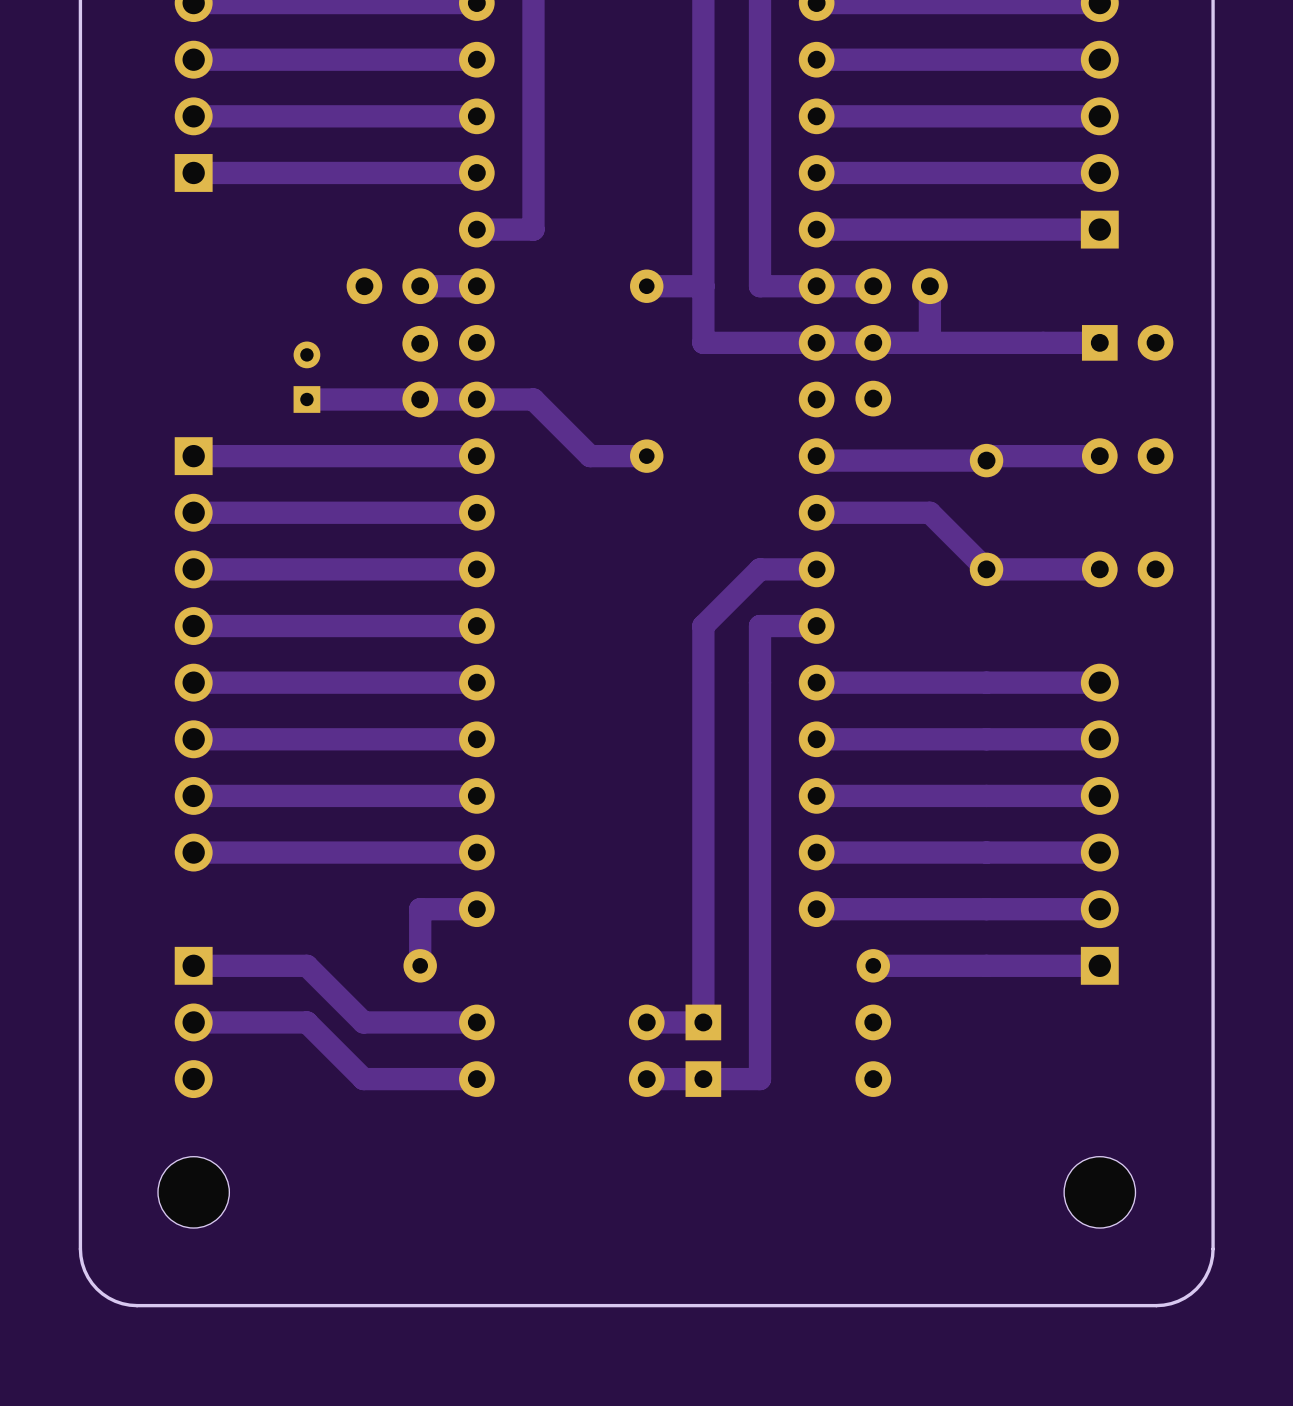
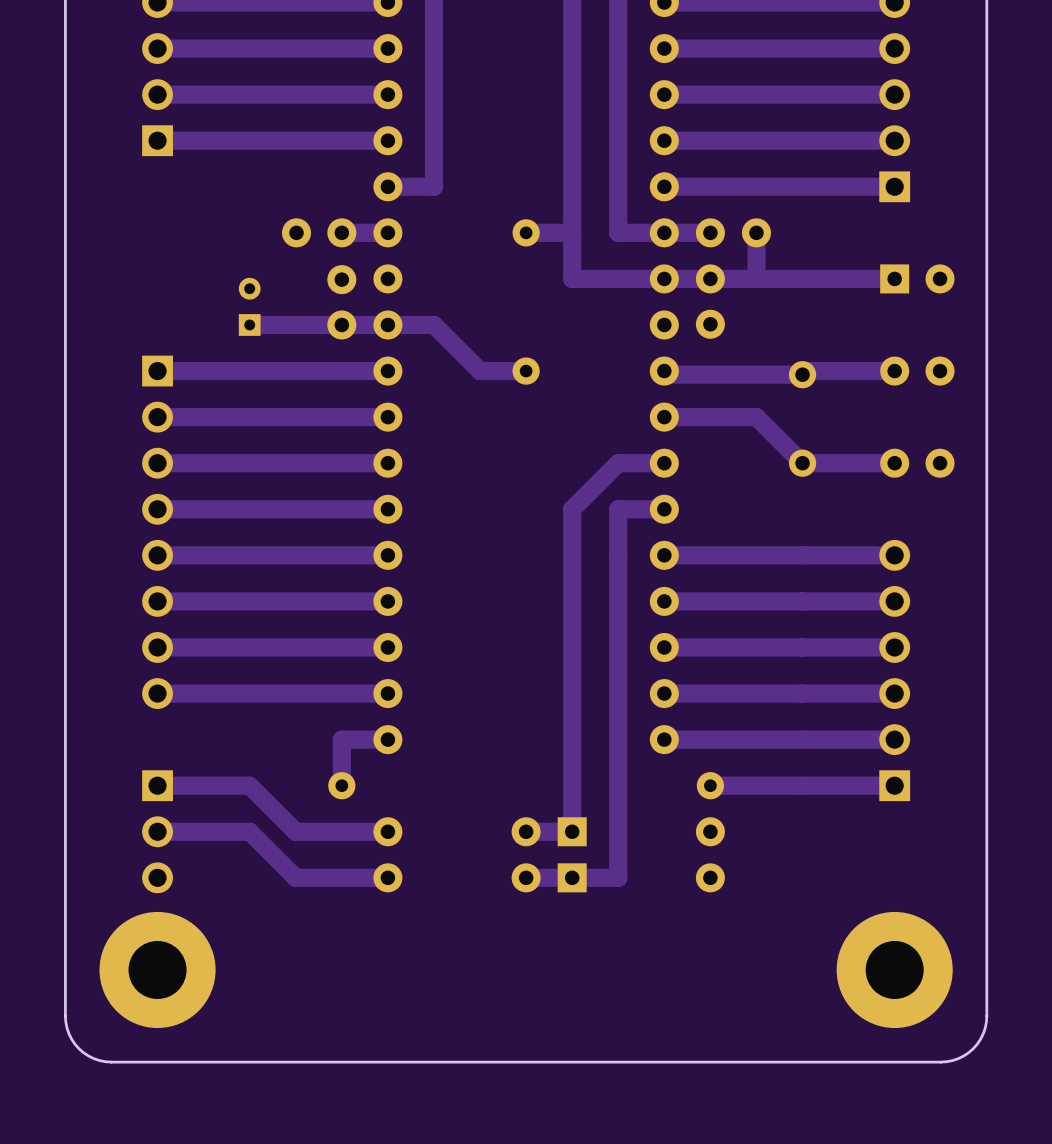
part footprint: [158, 1156, 230, 1229] -> [99, 911, 216, 1029]
part footprint: [1064, 1156, 1136, 1229] -> [836, 911, 953, 1029]

